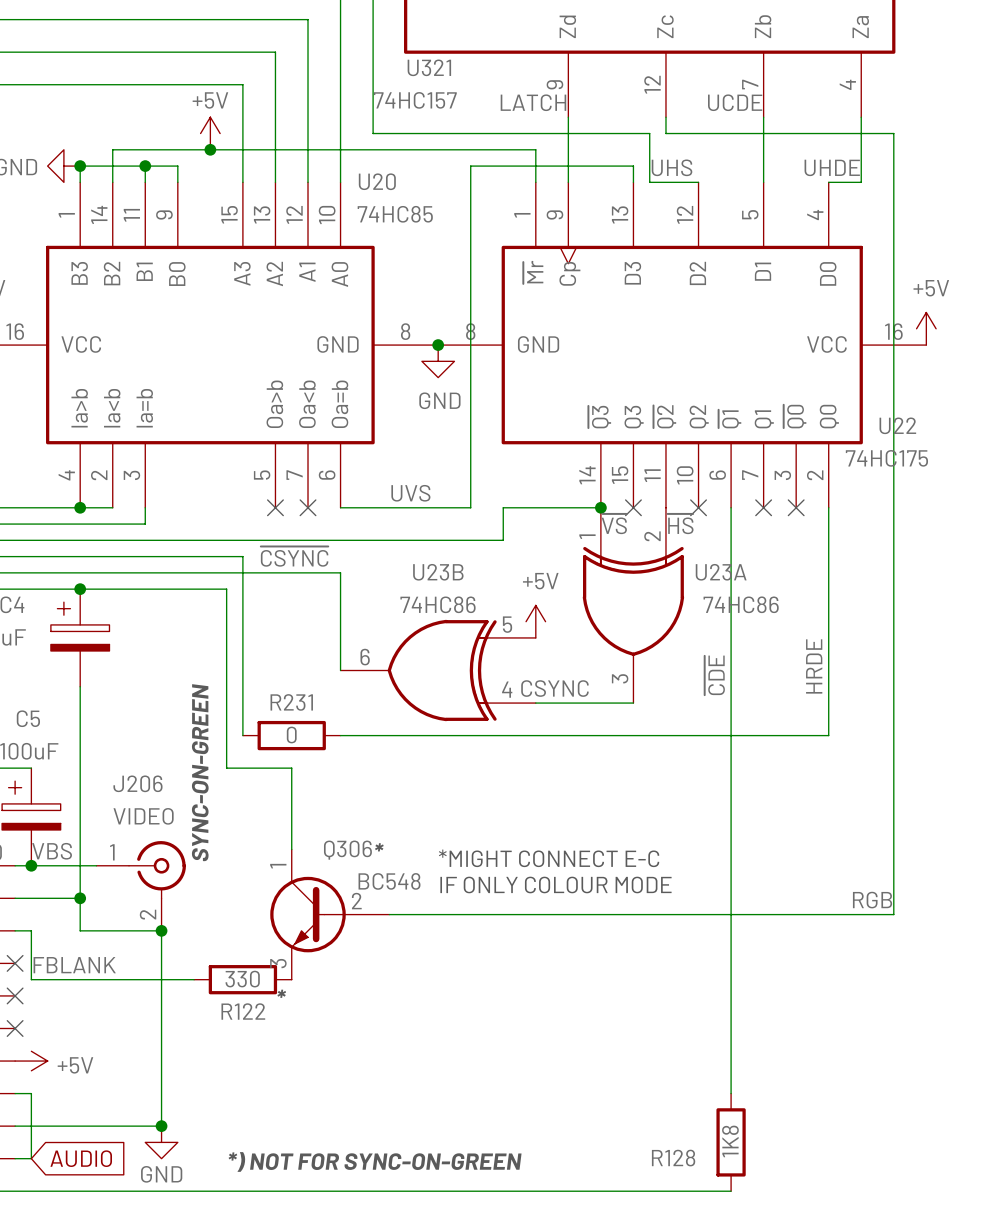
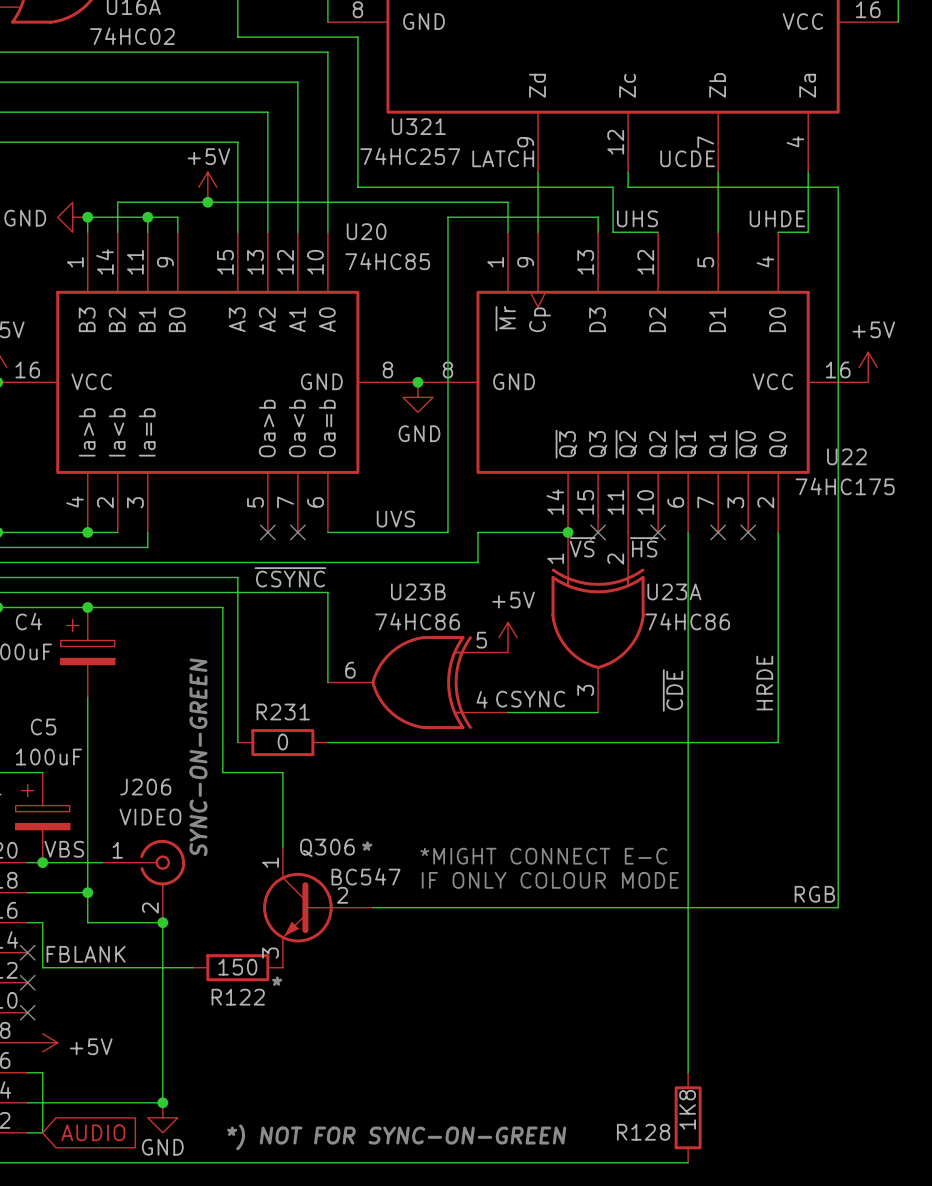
U321 value: 74HC157 (415, 100) -> 74HC257 (410, 156)
Q306 value: BC548 (389, 881) -> BC547 (366, 876)
R122 value: 330 (242, 979) -> 150 (237, 967)

